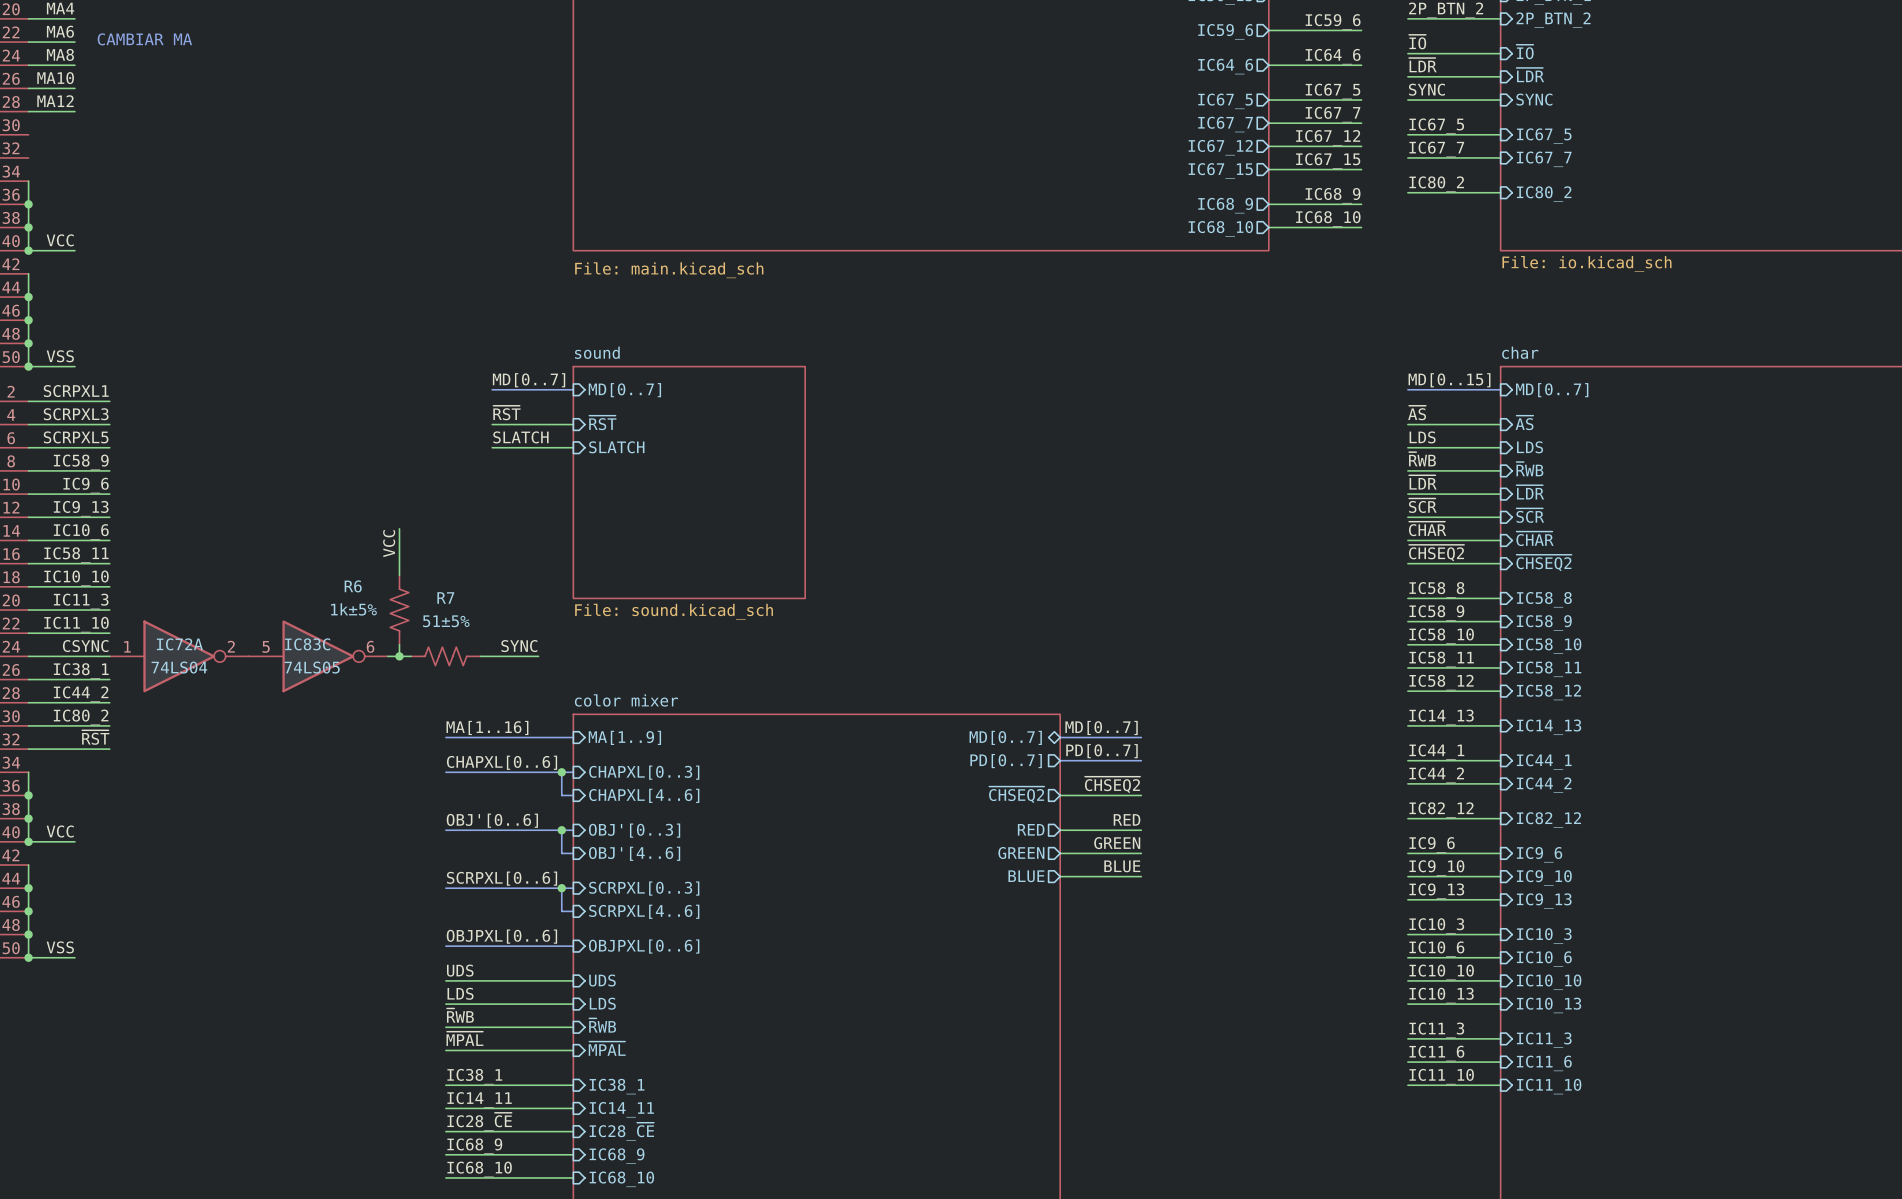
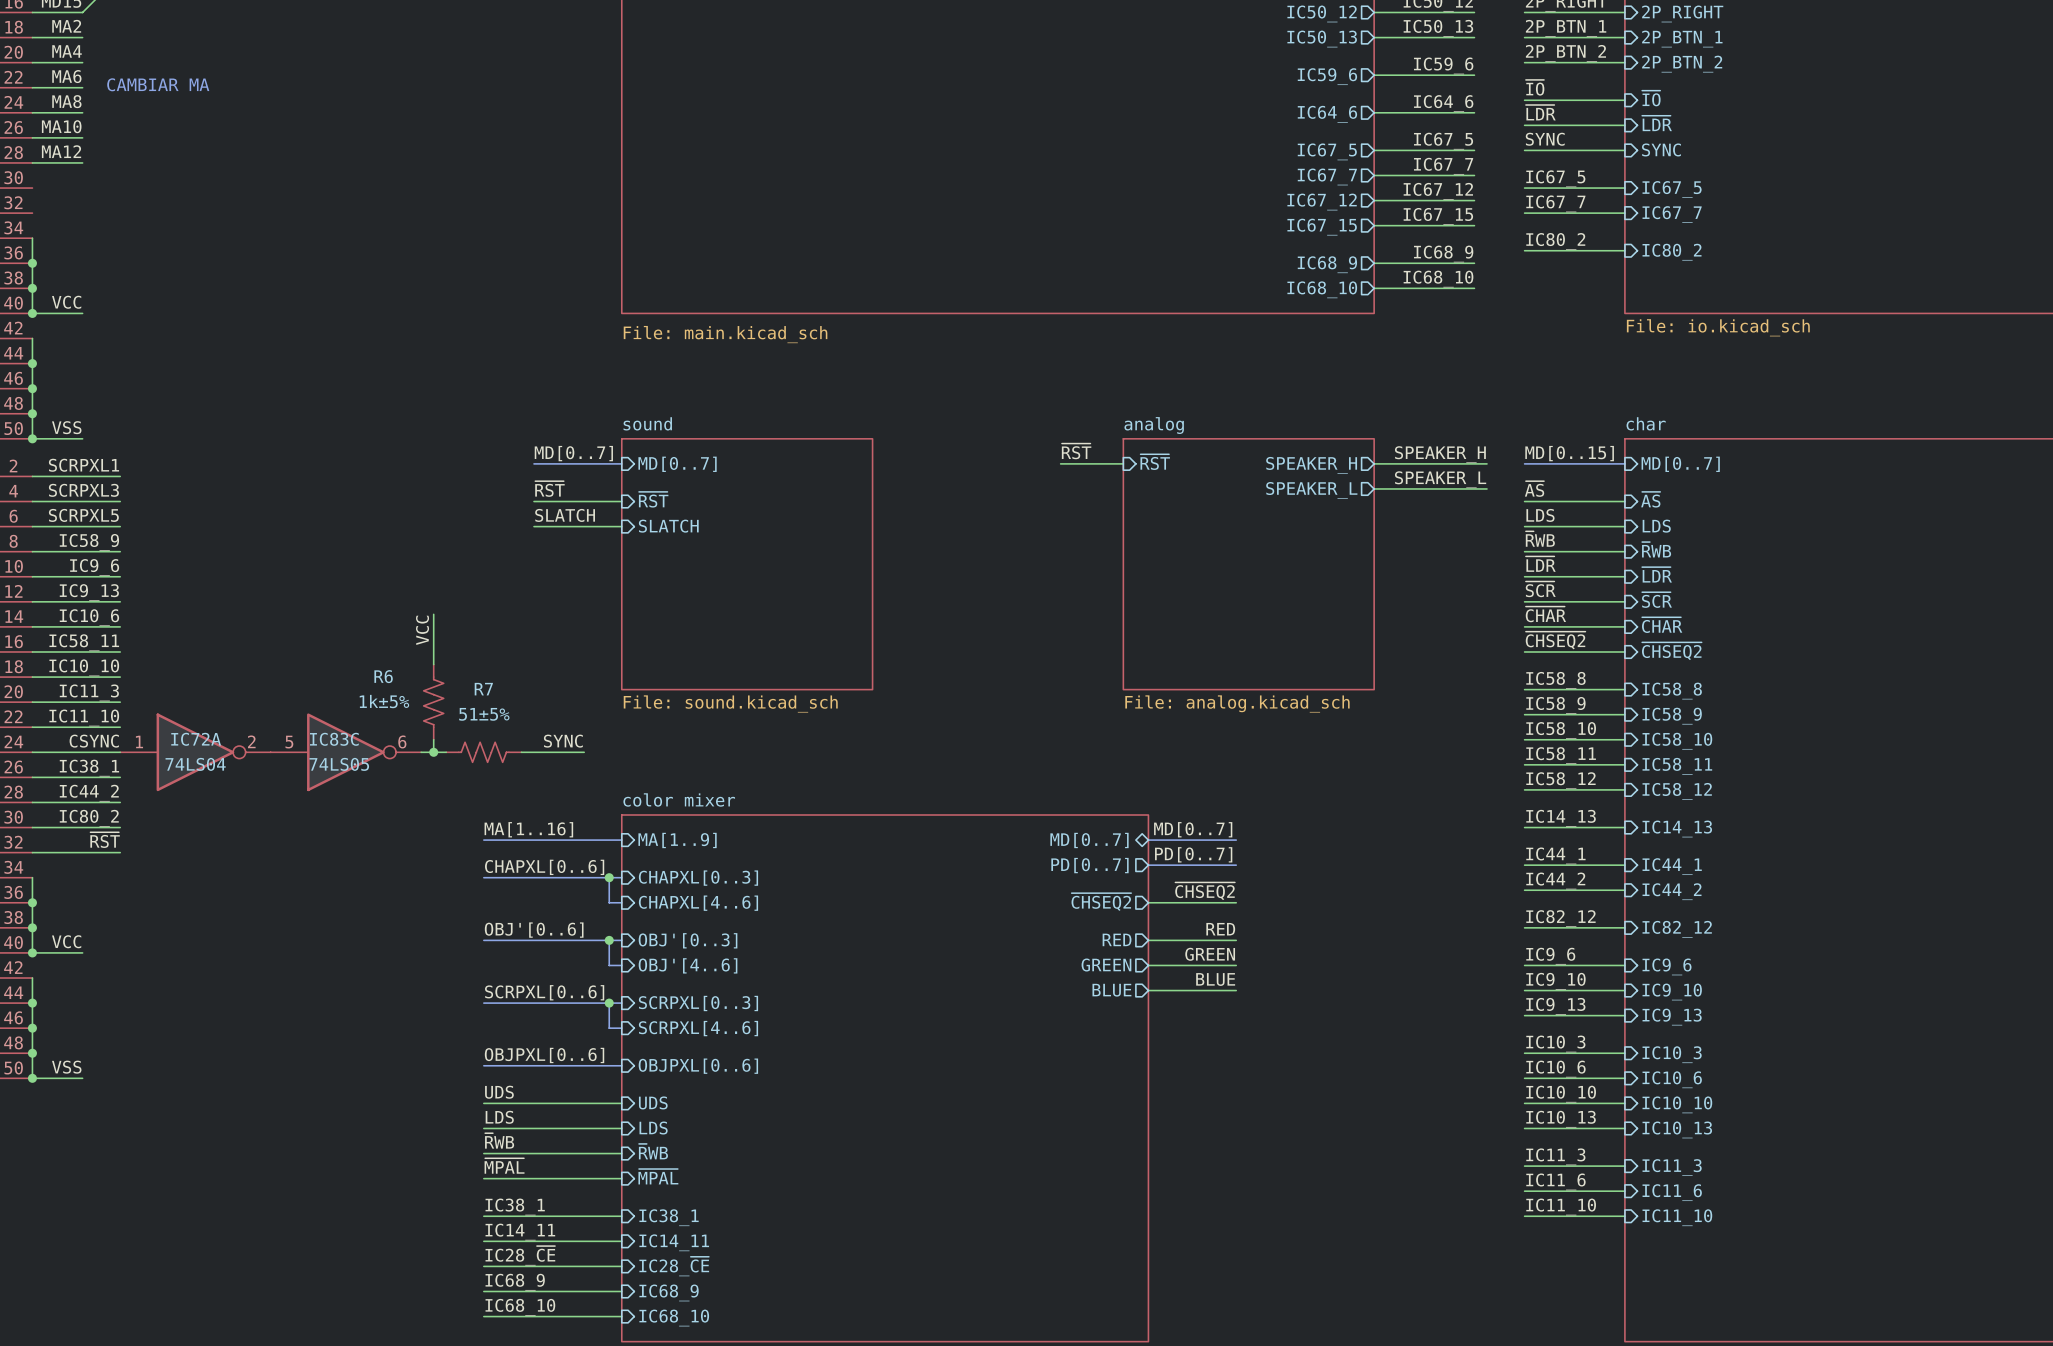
label: none -> ~{RST} (1076, 451)
label: none -> SPEAKER_H (1440, 454)
sheet pin: none -> ~{RST} (1155, 462)
wire: none -> (1060, 463) (1123, 463)
wire: none -> (1374, 463) (1486, 463)
sheet pin: none -> SPEAKER_H (1311, 465)
label: none -> SPEAKER_L (1440, 479)
wire: none -> (1374, 488) (1486, 488)
sheet pin: none -> SPEAKER_L (1311, 490)
sheet analog: none -> File: analog.kicad_sch (1248, 564)

